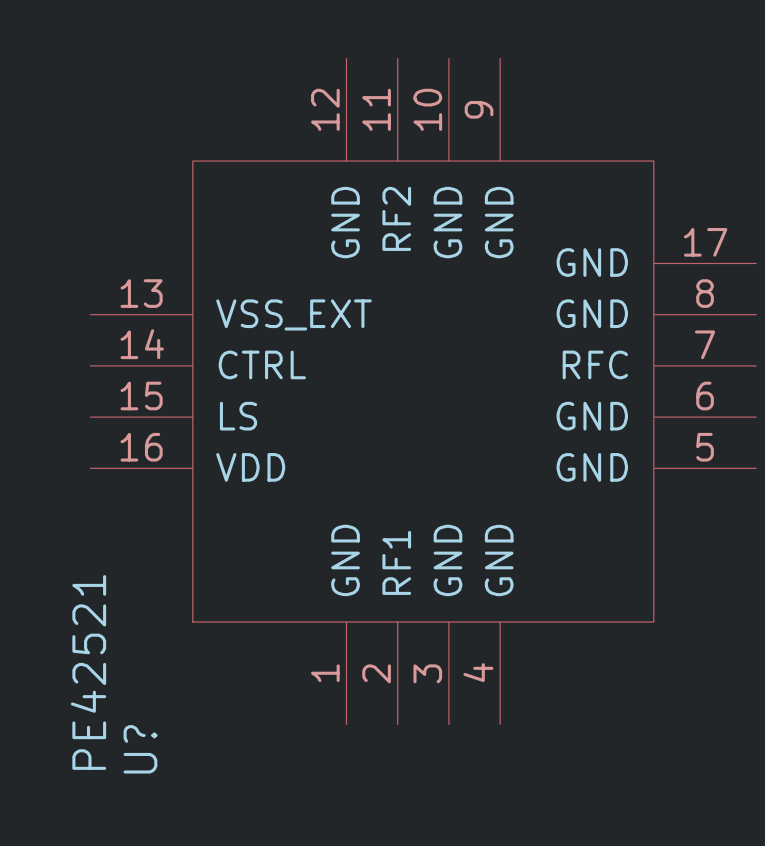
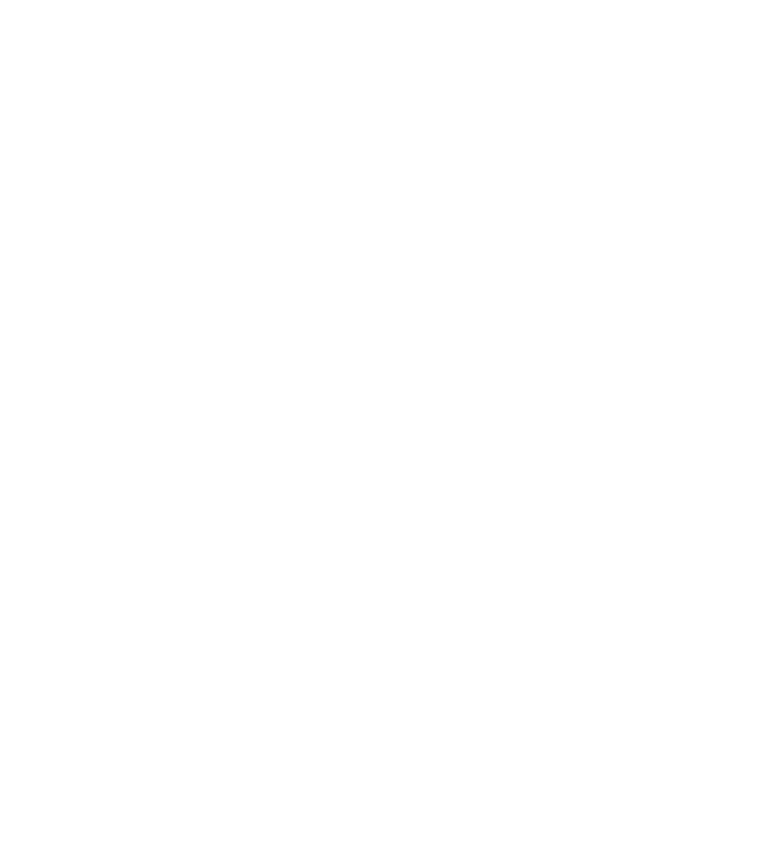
U?: PE42521 (423, 391) -> none

